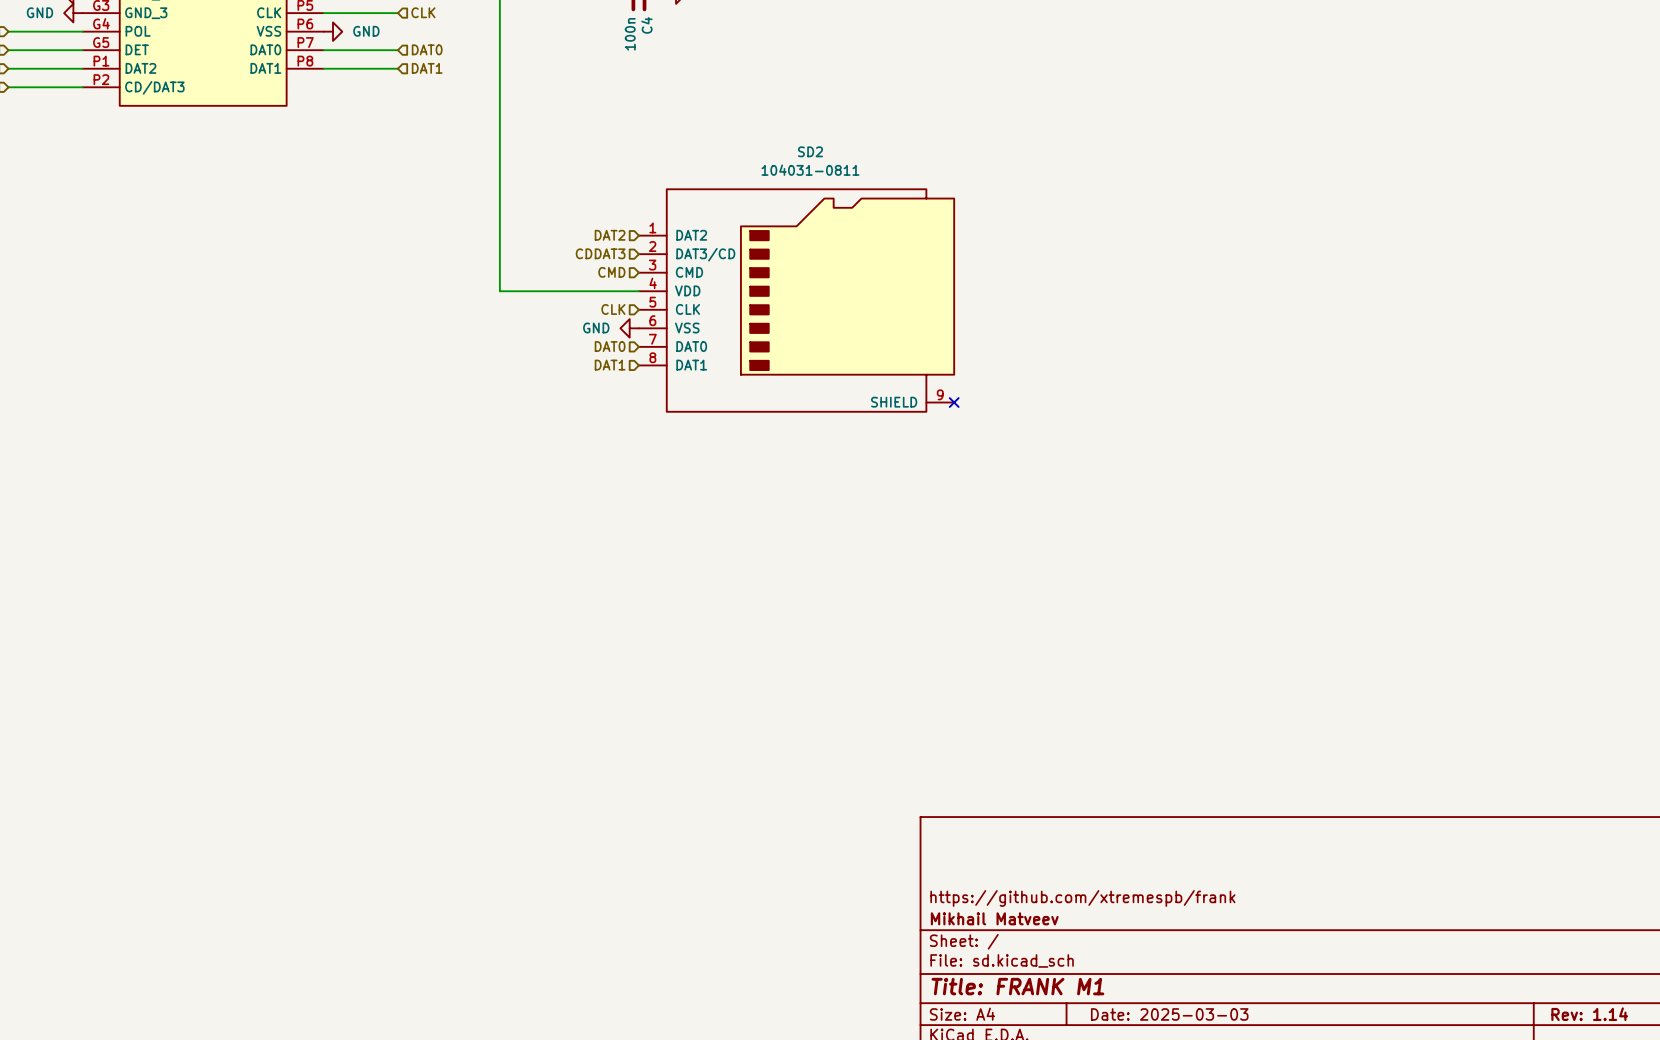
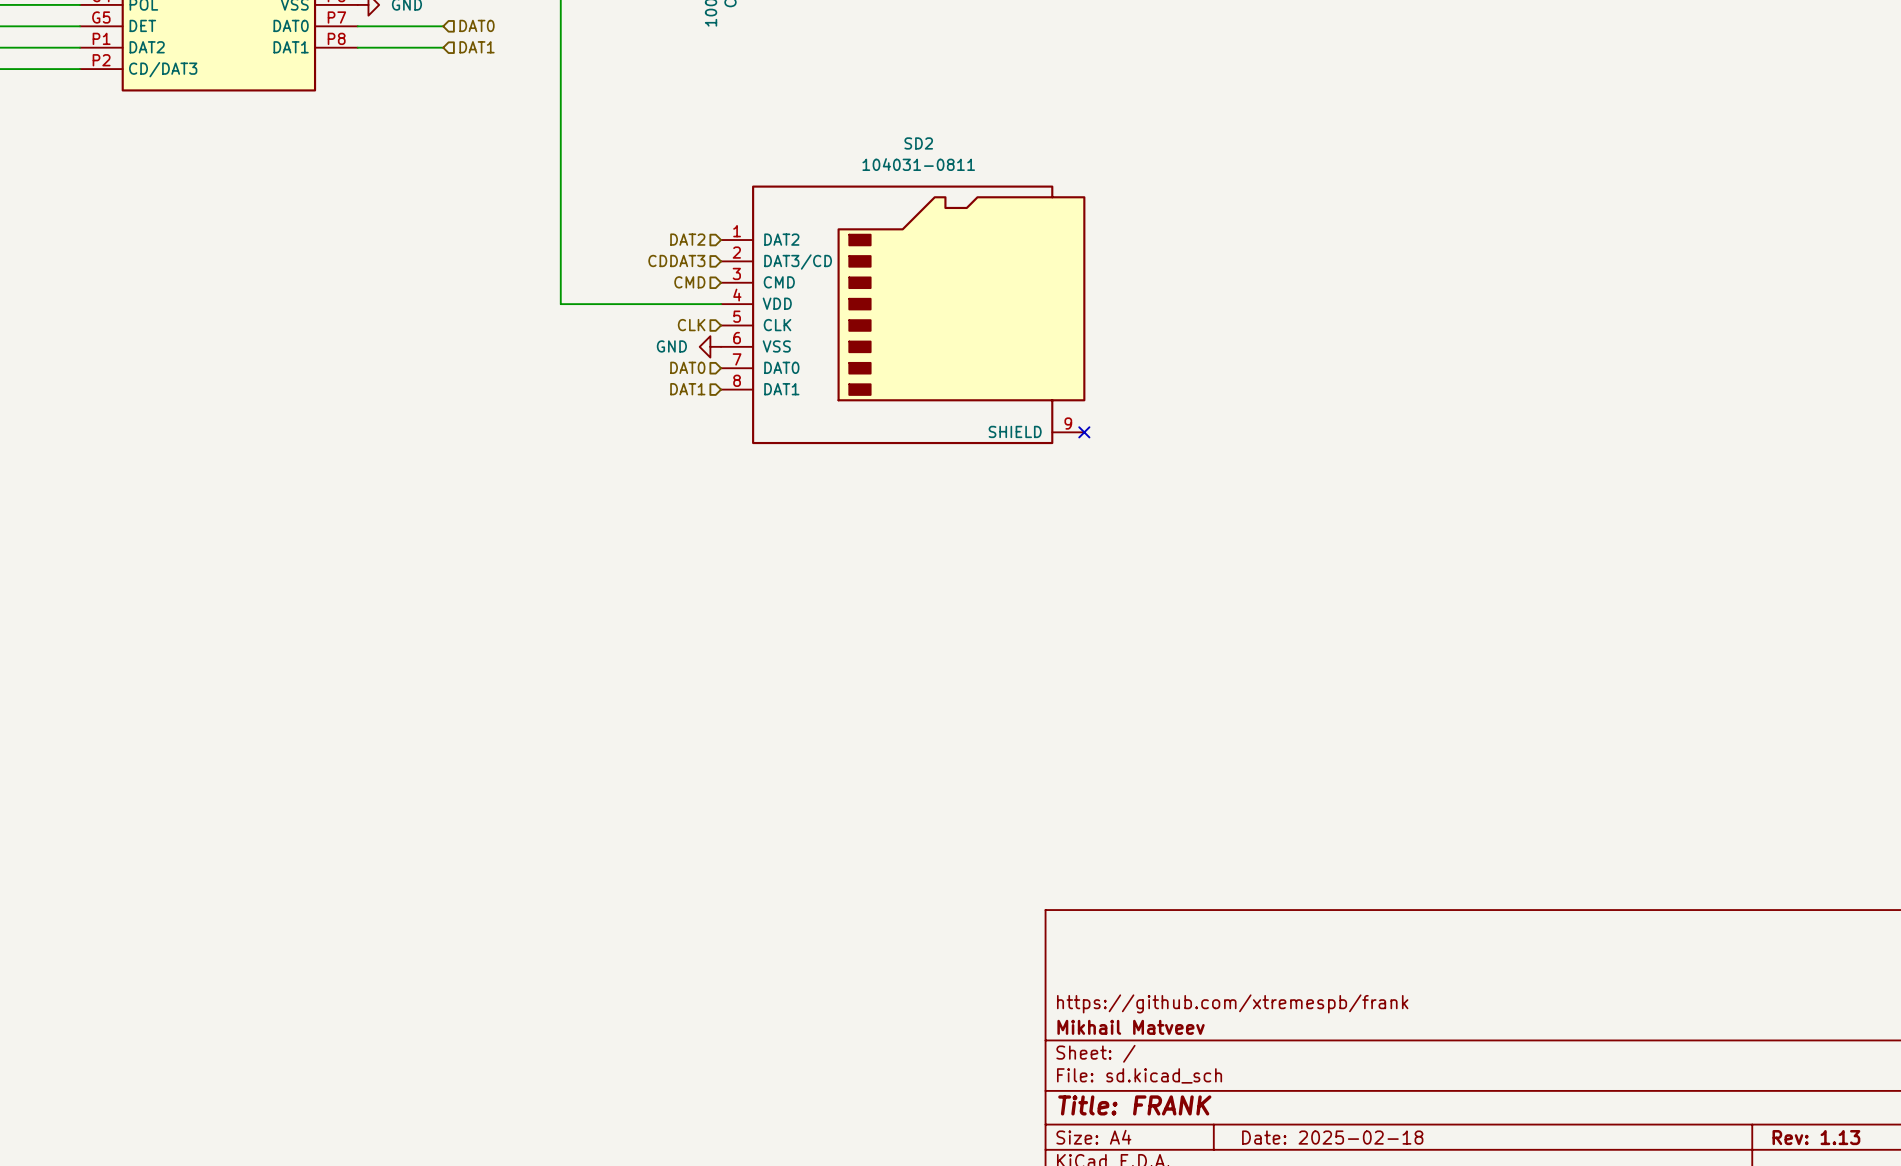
title block: Title: FRANK M1 (1017, 986) -> Title: FRANK (1134, 1105)
title block: Date: 2025-03-03 (1169, 1014) -> Date: 2025-02-18 (1332, 1137)
title block: Rev: 1.14 (1589, 1014) -> Rev: 1.13 (1816, 1137)

